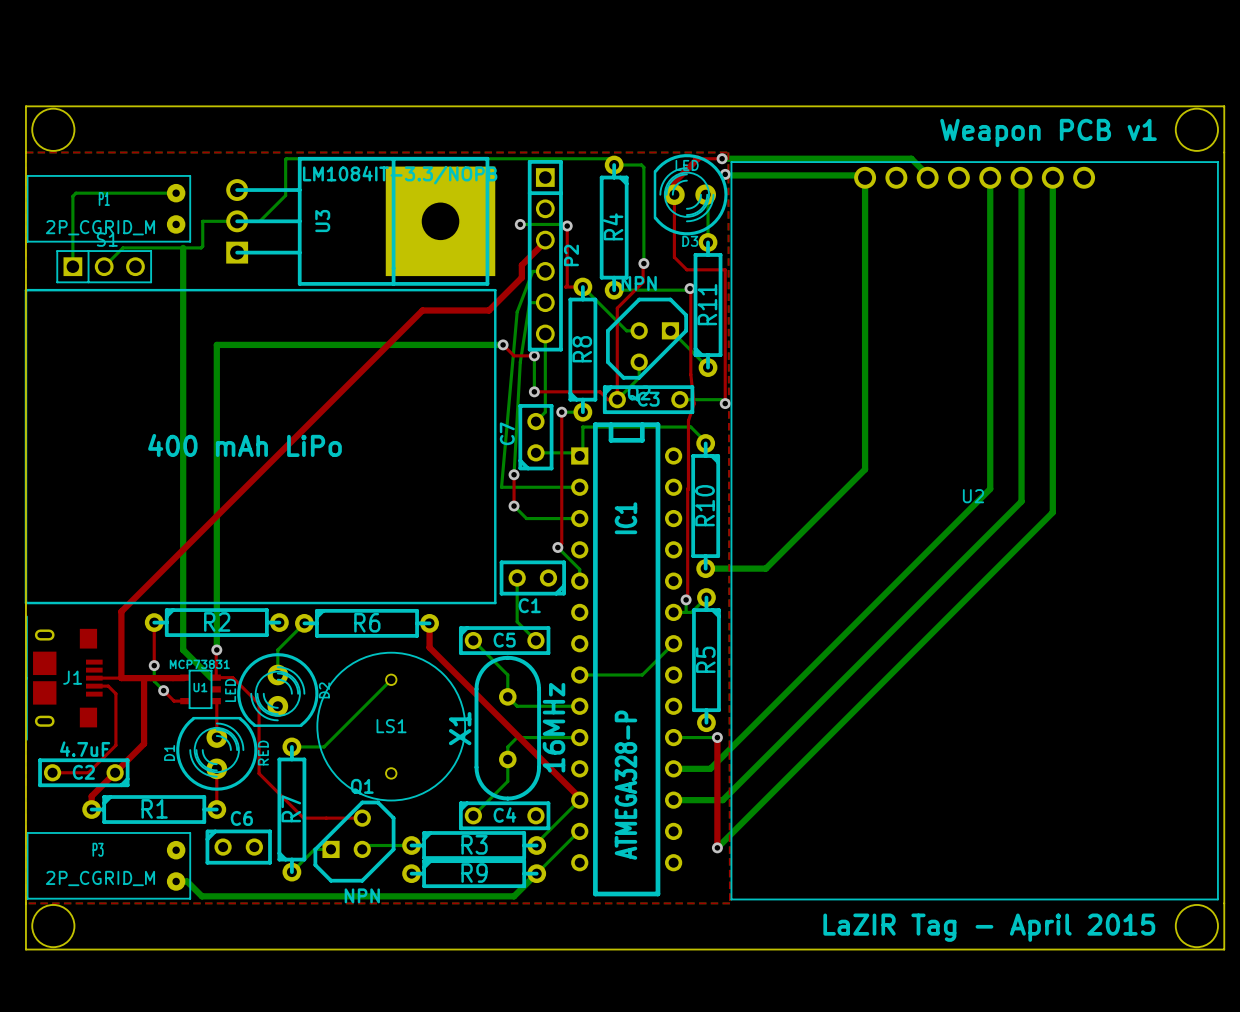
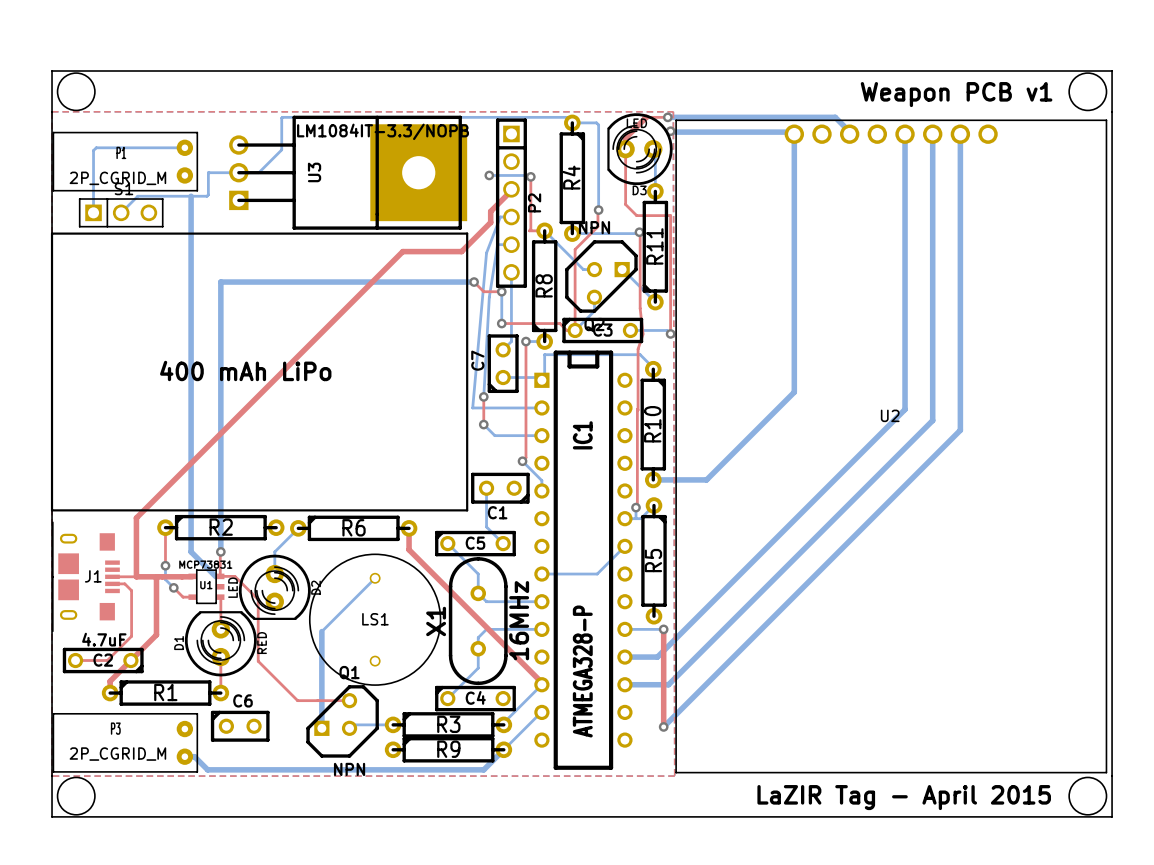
bottom track: (331, 740) (324, 746) (291, 746) -> (321, 631) (321, 728)
R7: (291, 809) -> none
bottom track: (331, 849) (314, 849) (291, 872) -> none

